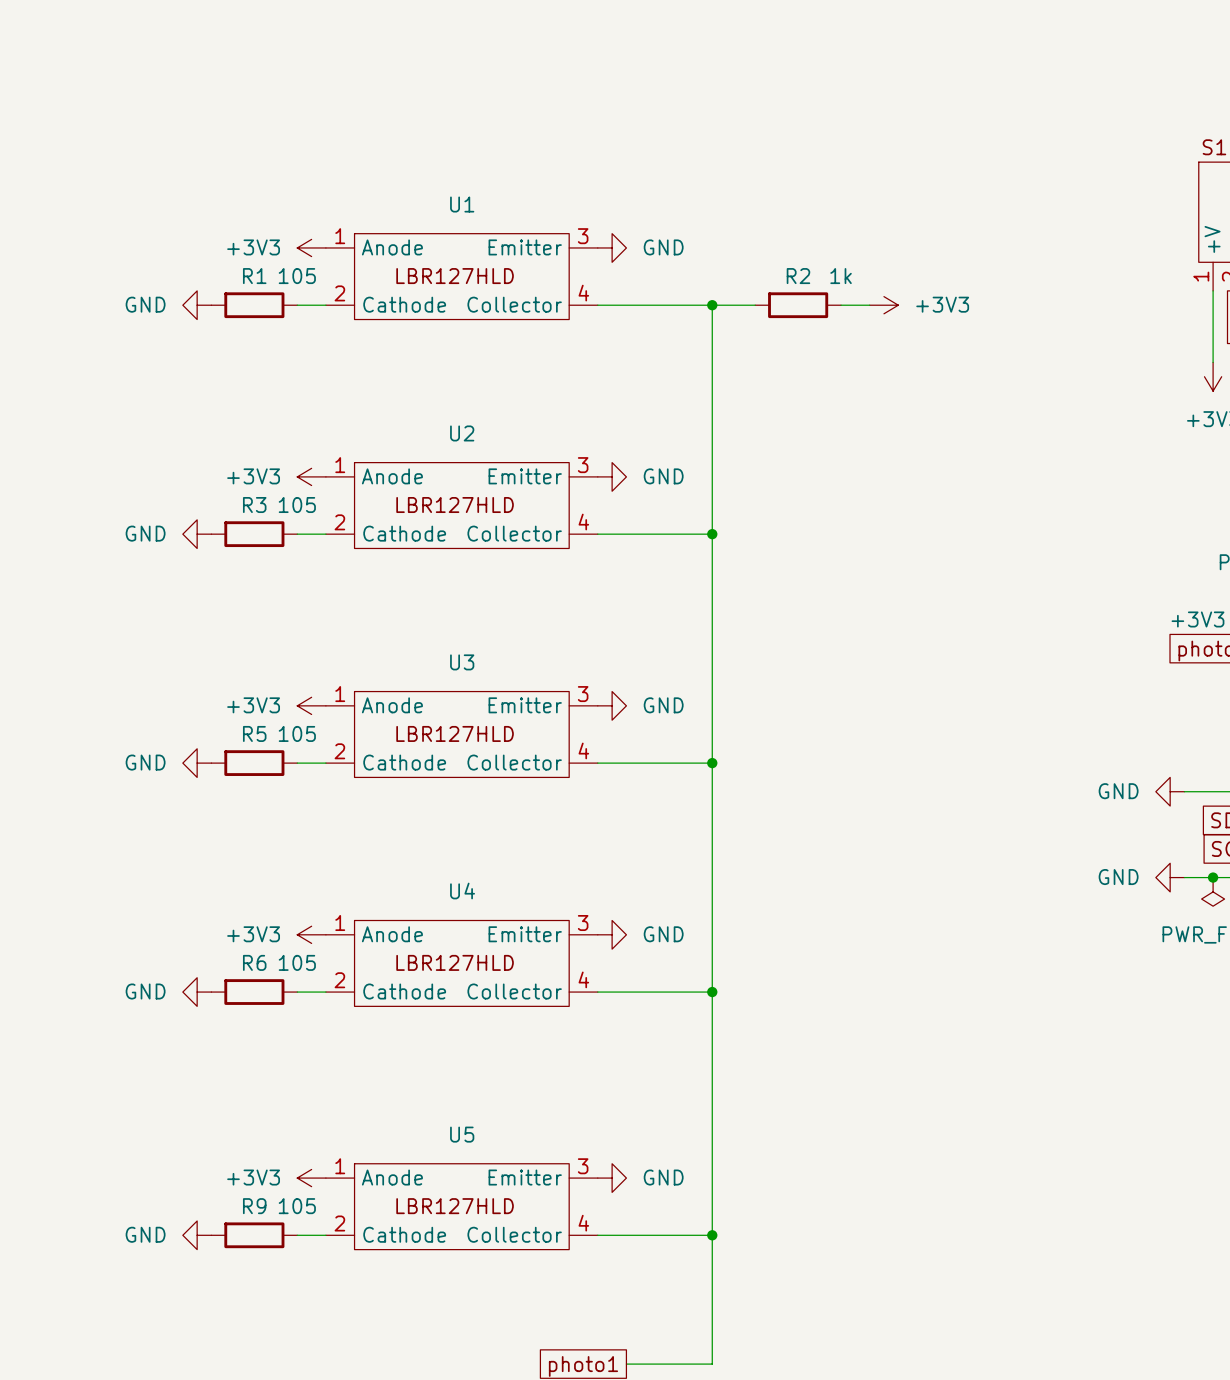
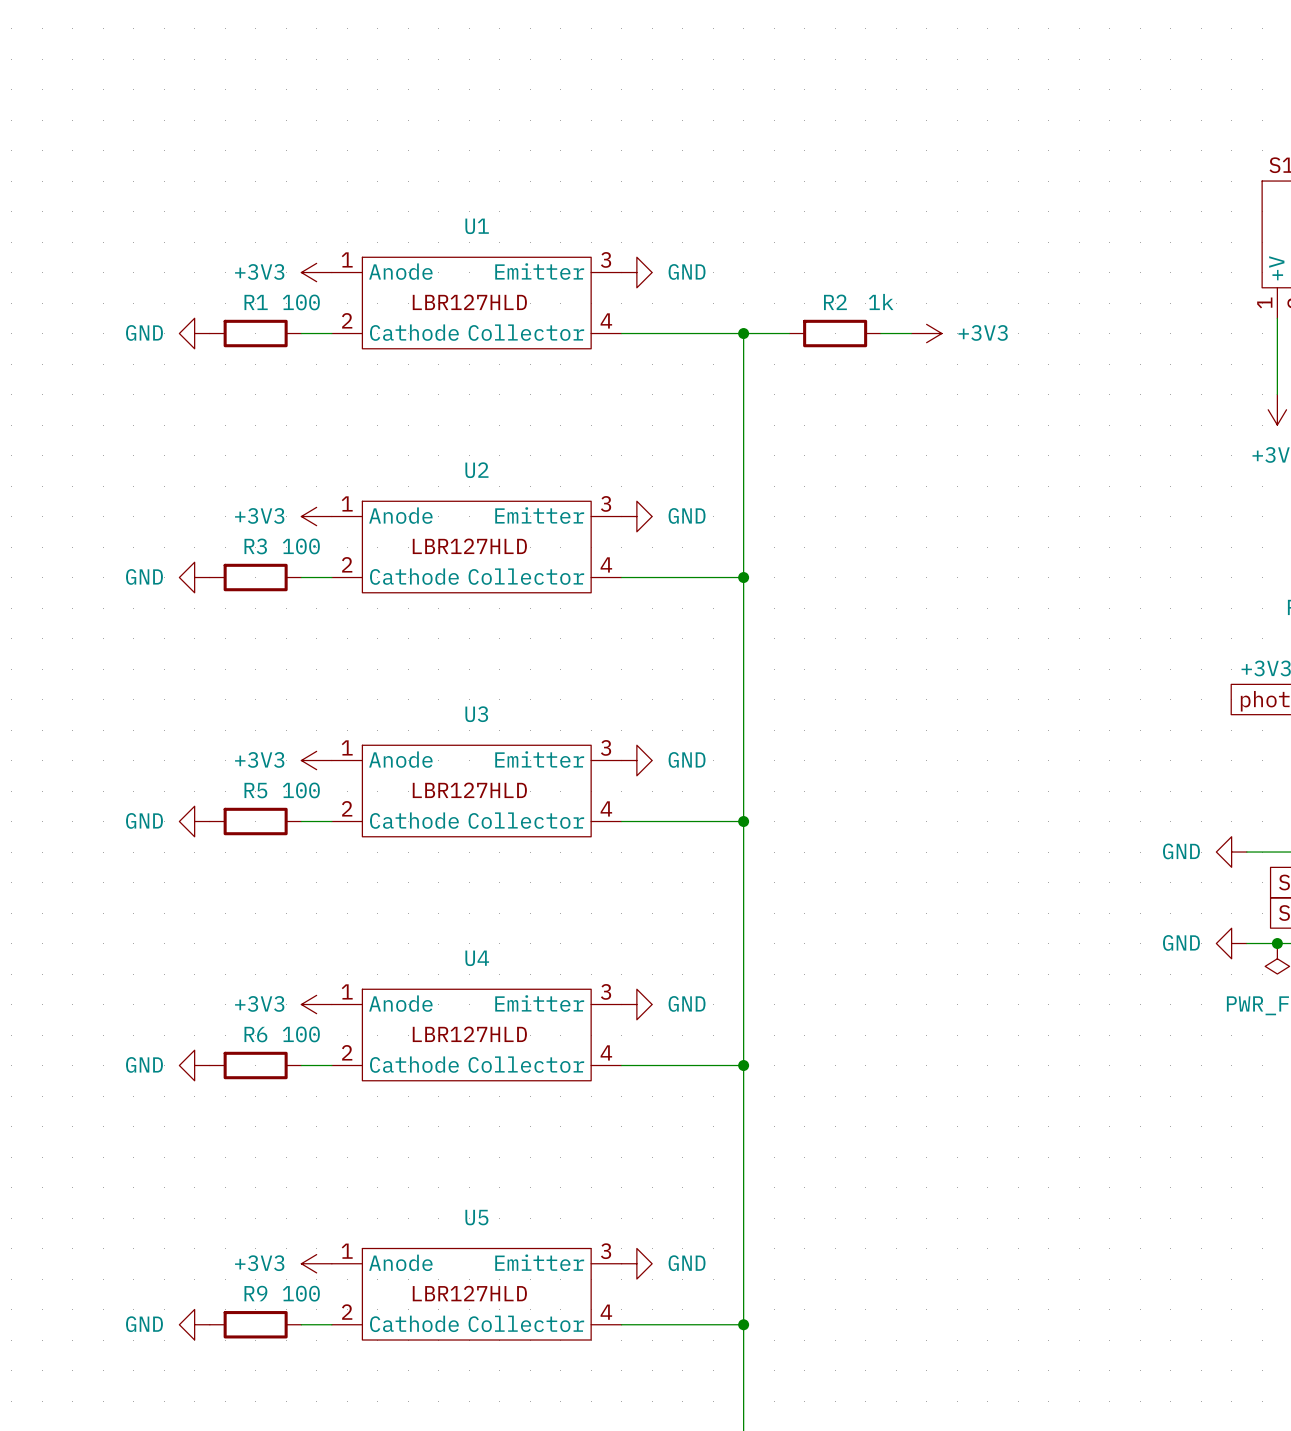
R1 value: 105 (297, 276) -> 100 (301, 302)
R3 value: 105 (297, 505) -> 100 (301, 546)
R5 value: 105 (297, 733) -> 100 (301, 790)
R6 value: 105 (297, 962) -> 100 (301, 1034)
R9 value: 105 (297, 1206) -> 100 (301, 1293)

